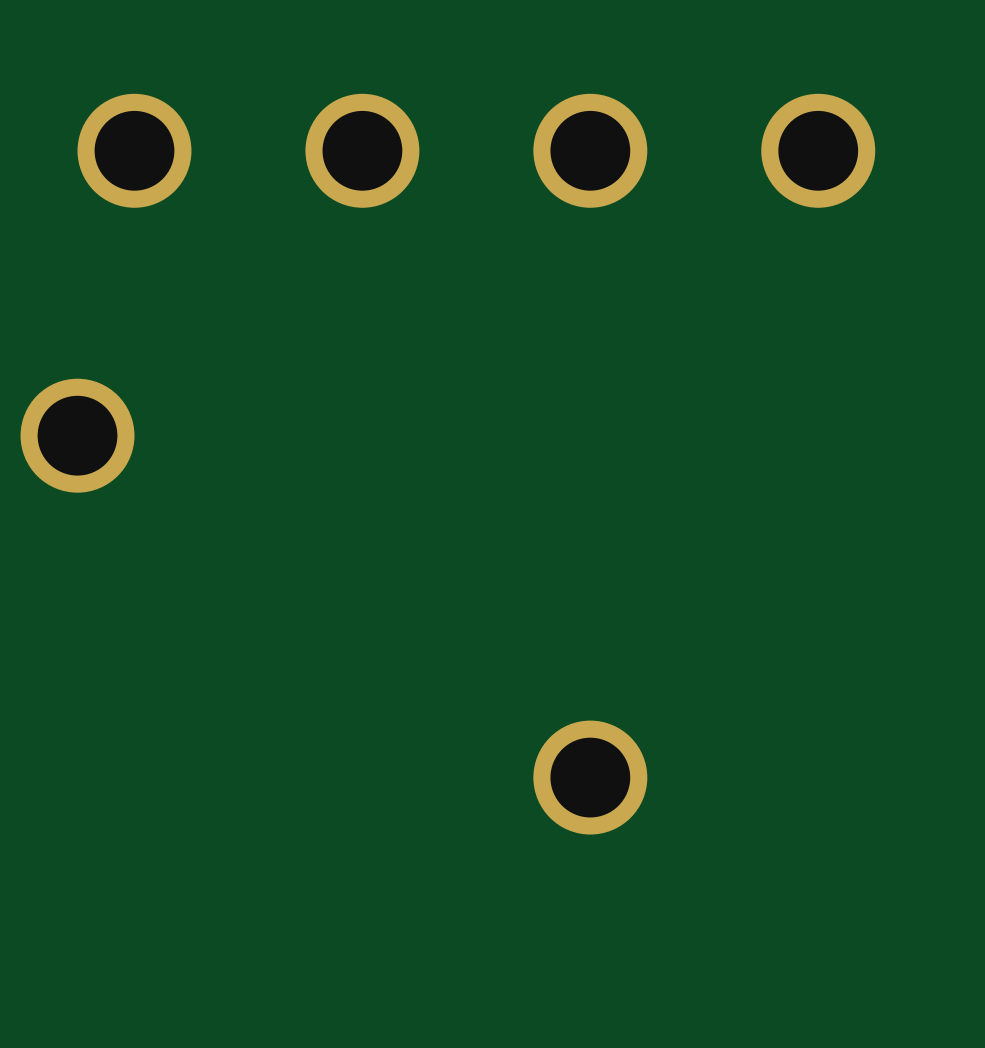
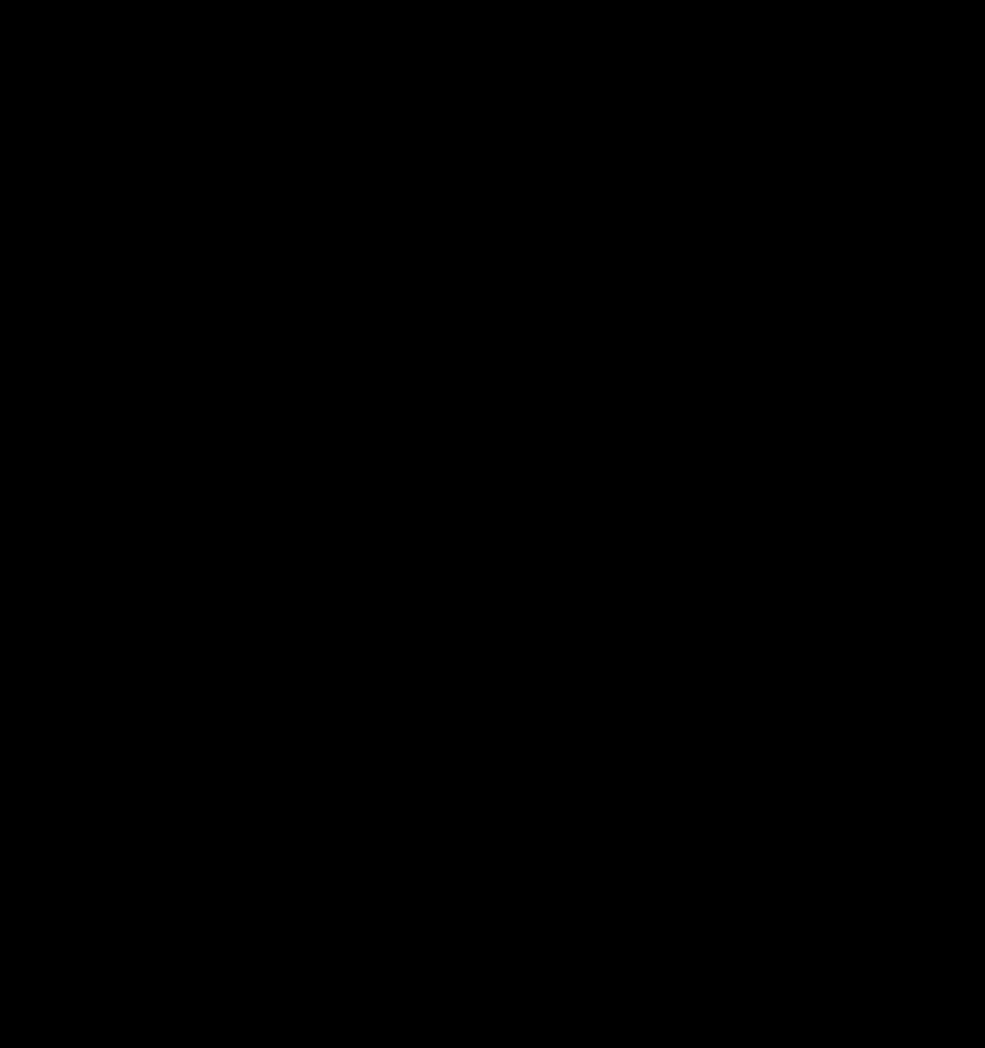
via: (134, 150) -> none
via: (362, 150) -> none
via: (590, 150) -> none
via: (818, 150) -> none
via: (77, 435) -> none
via: (590, 777) -> none

